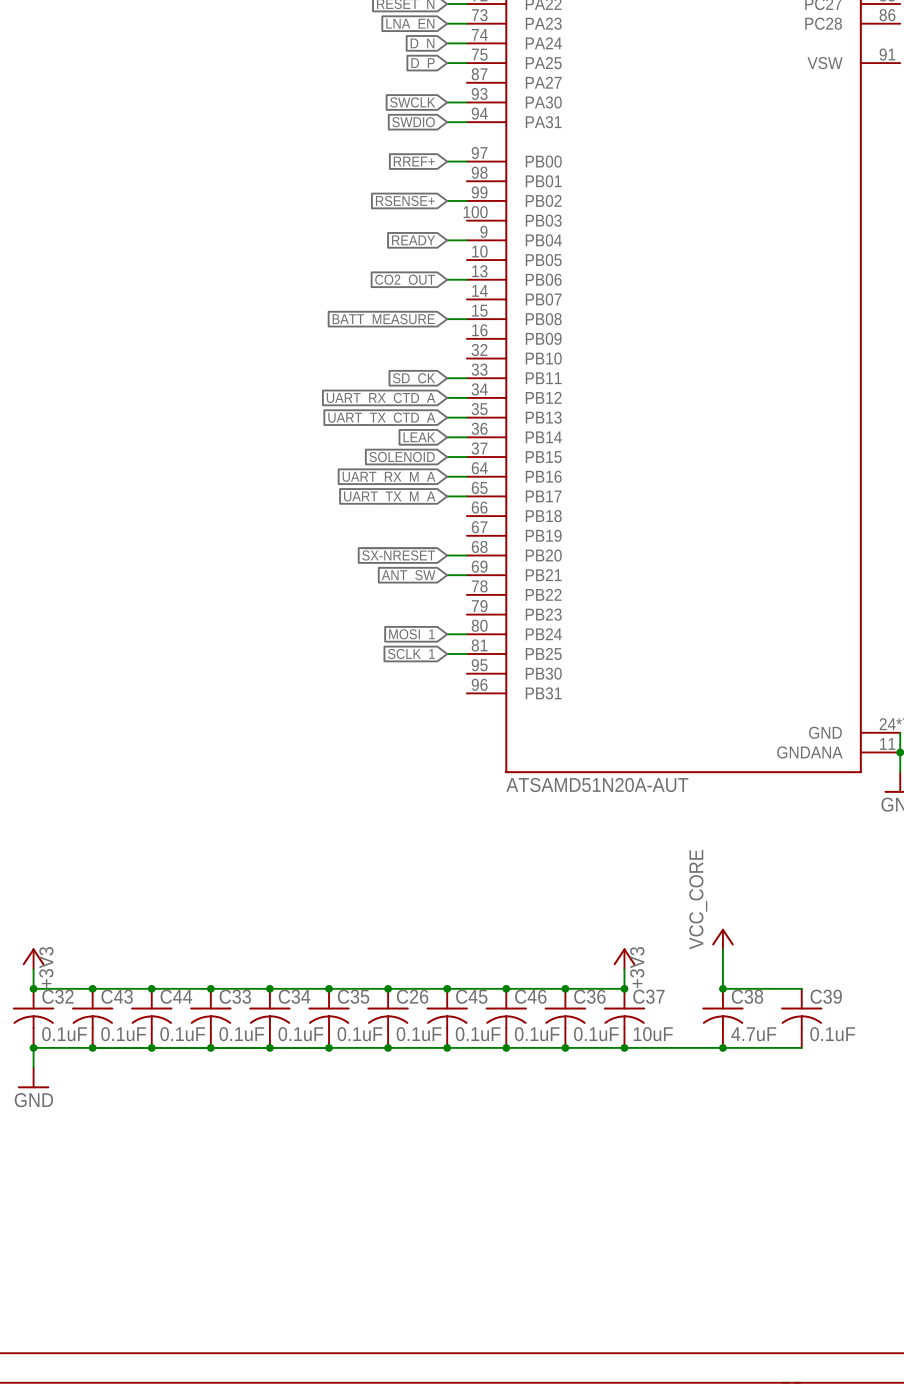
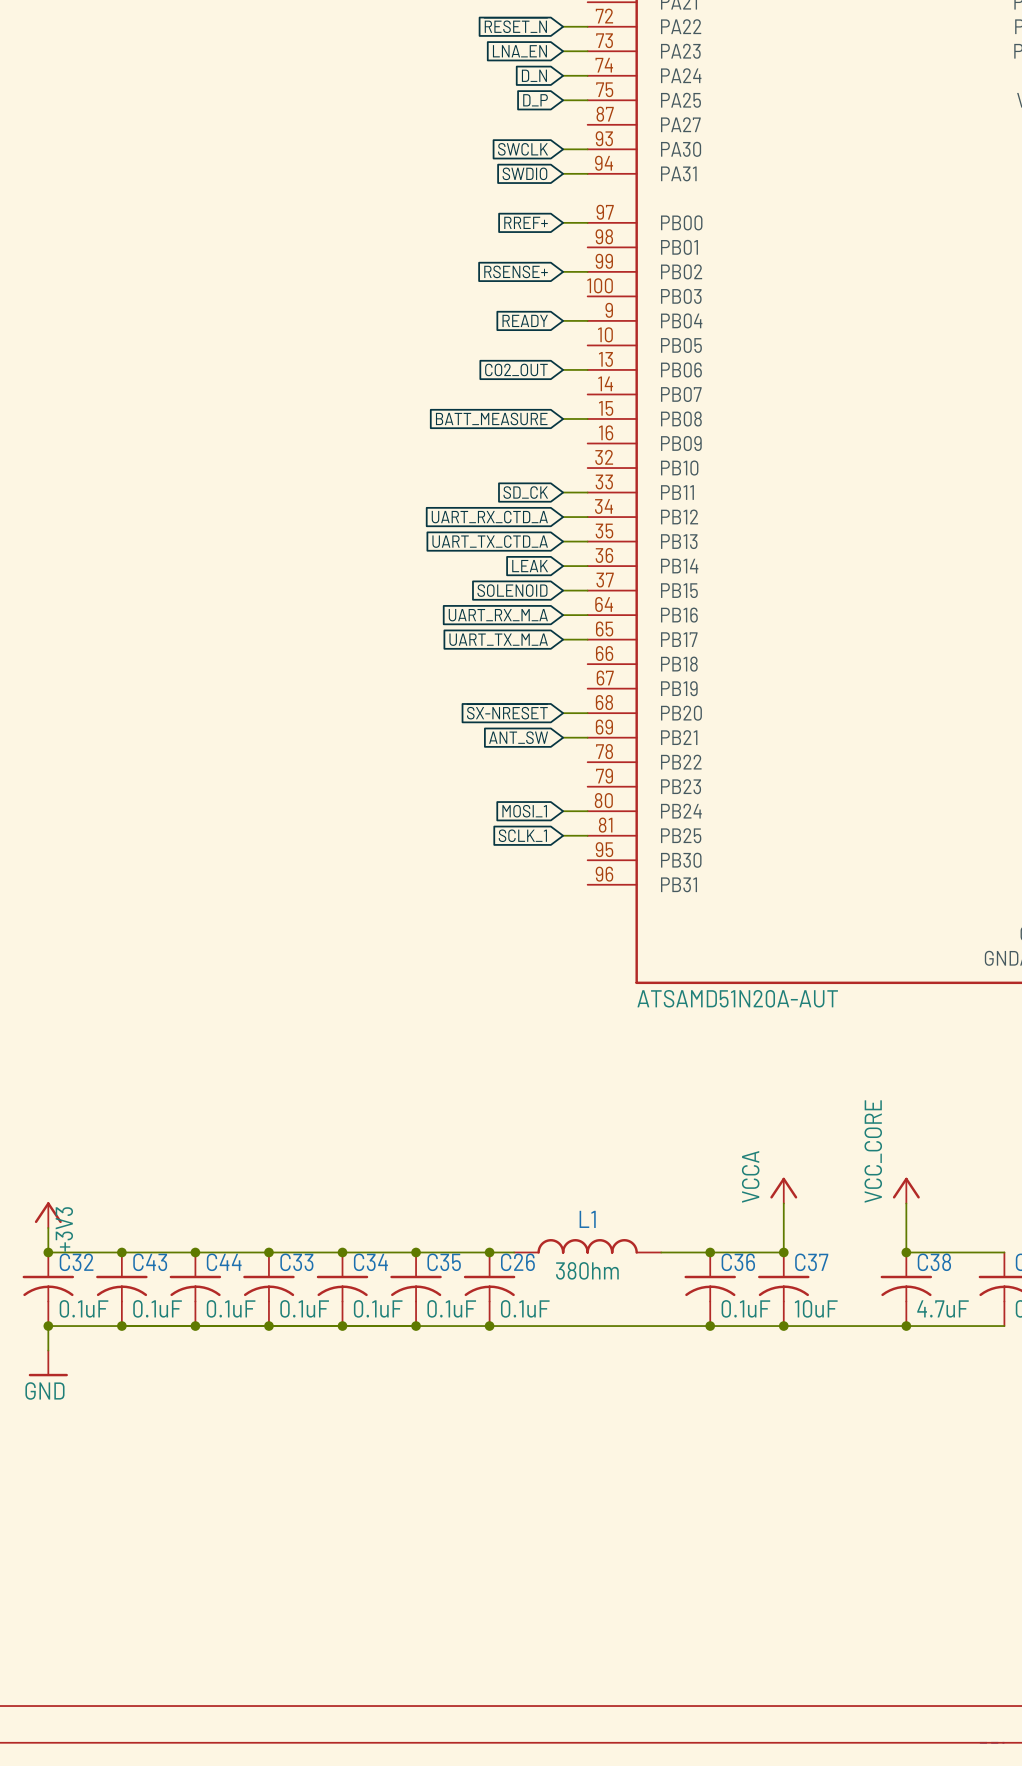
power symbol: none -> VCCA (783, 1190)
power symbol: +3V3 (624, 958) -> none
L1: none -> 380hm (587, 1246)
wire: (407, 988) (525, 988) -> none
junction: (447, 988) -> none
junction: (506, 988) -> none
C45: 0.1uF (447, 1018) -> none
C46: 0.1uF (506, 1018) -> none
junction: (447, 1047) -> none
junction: (506, 1047) -> none

